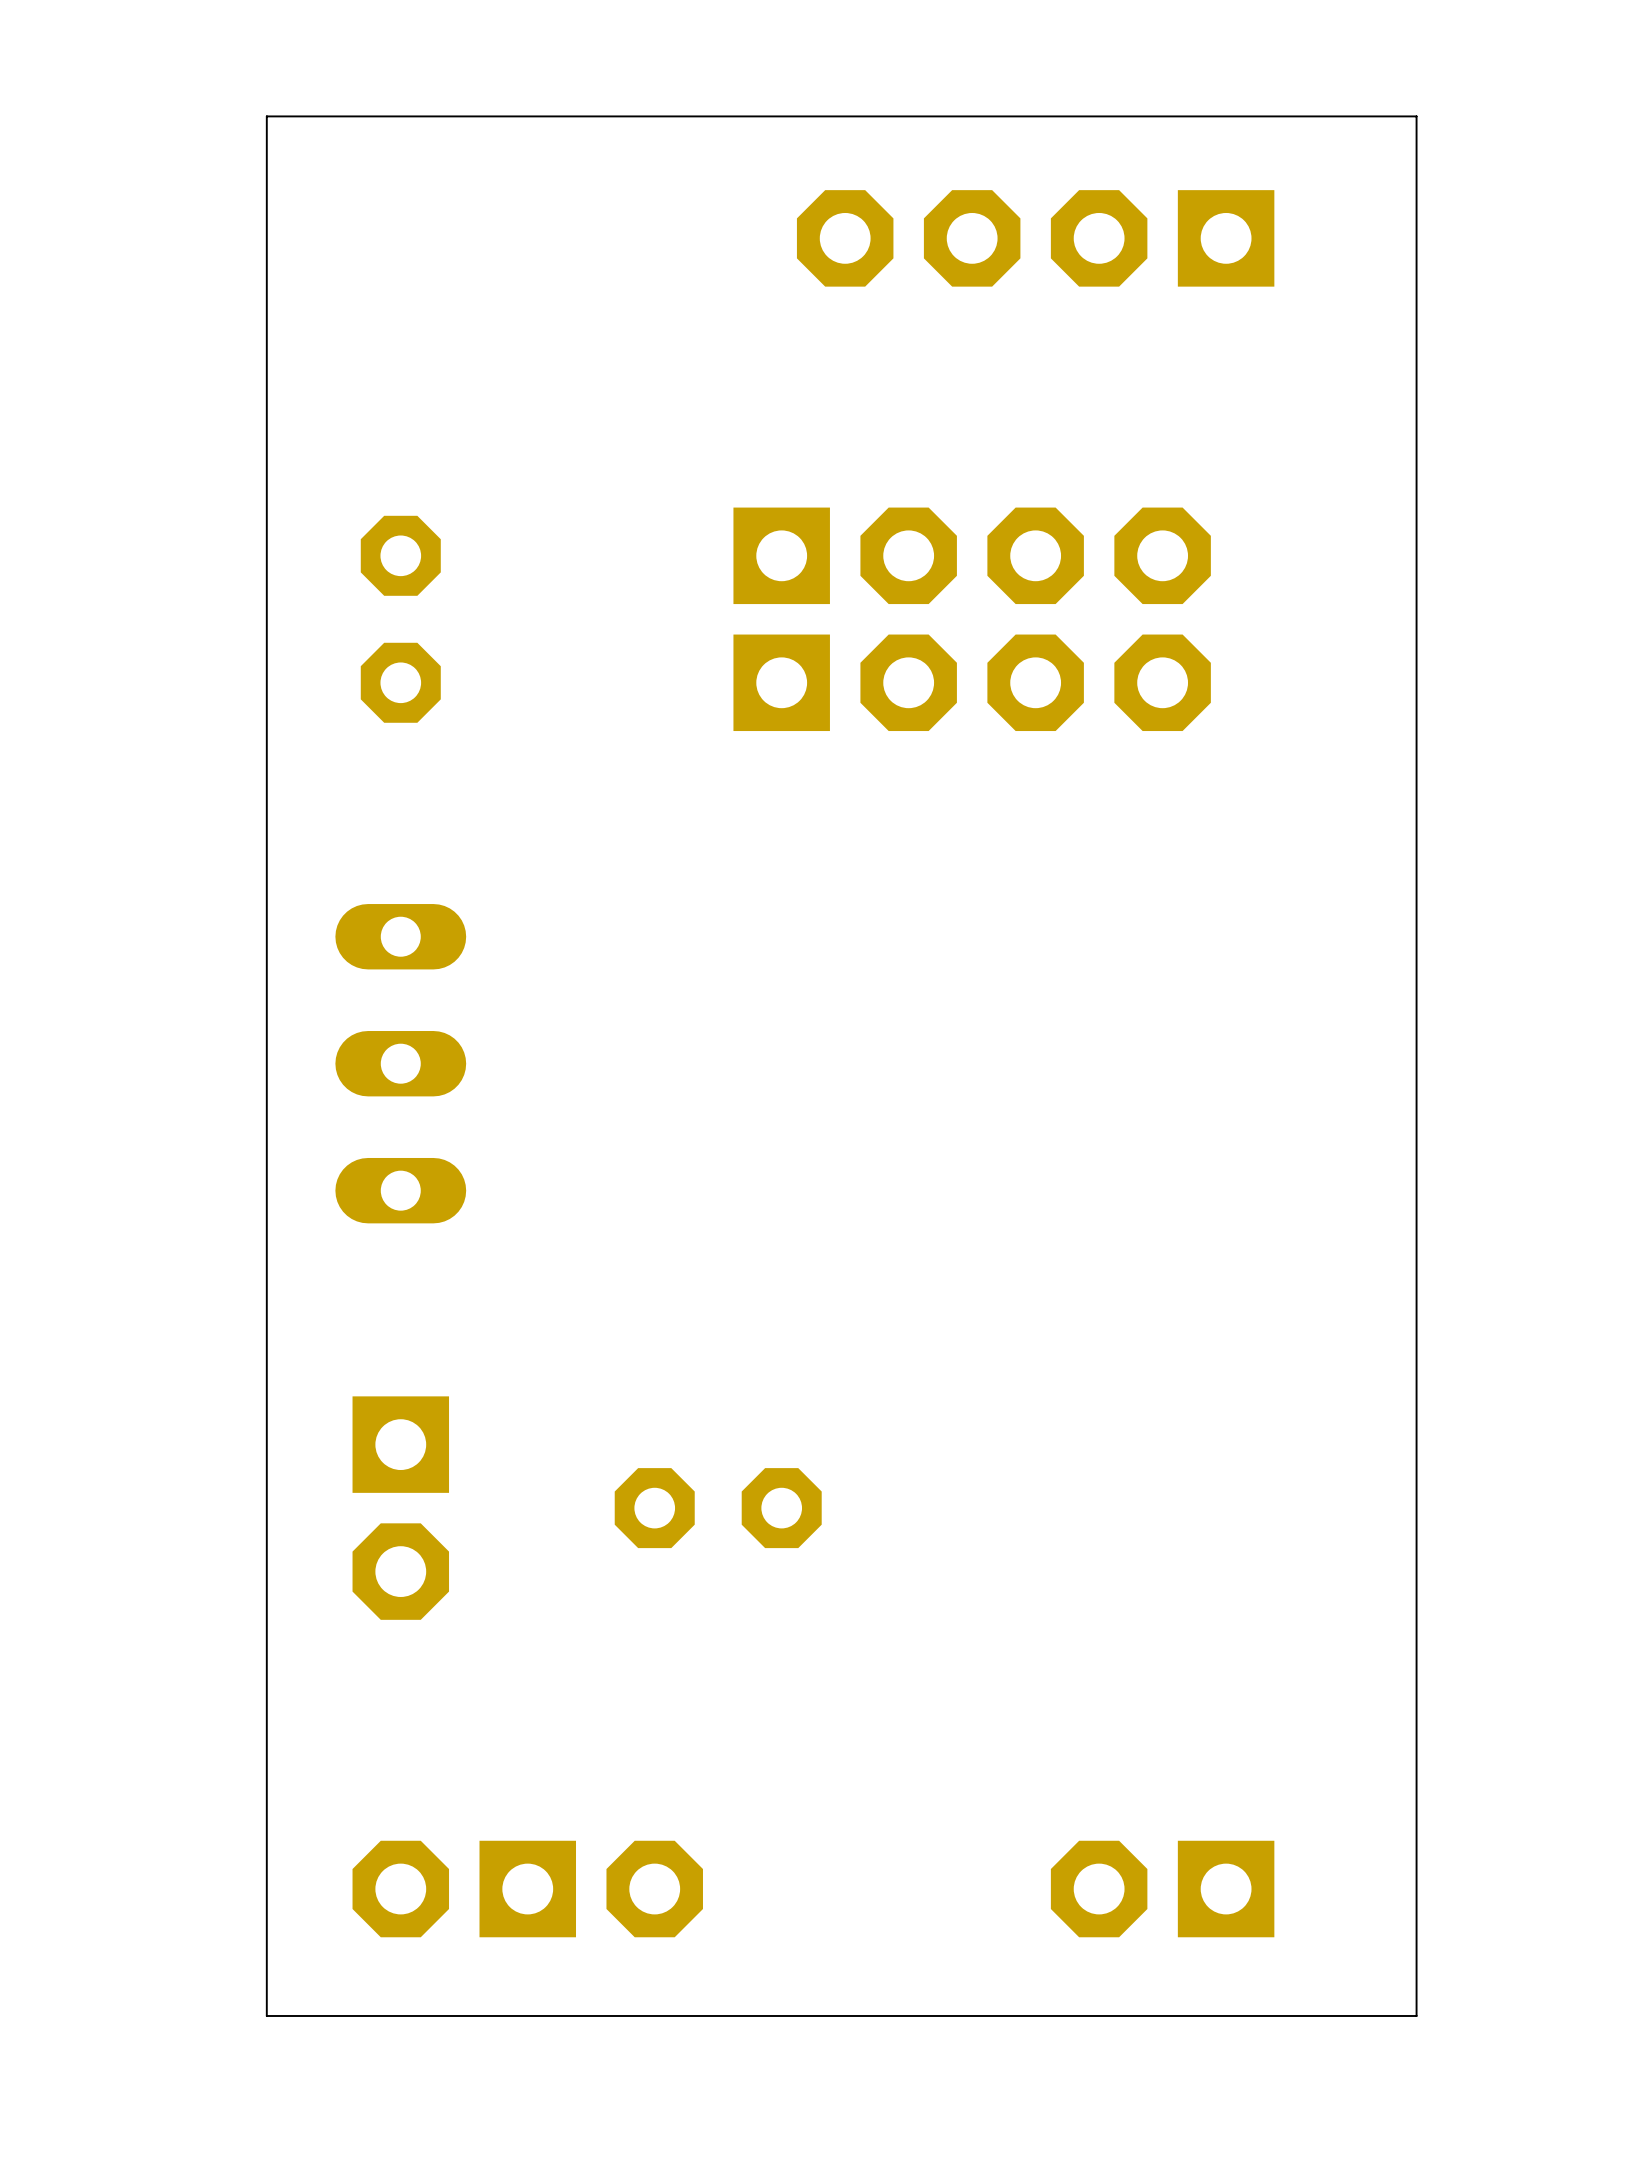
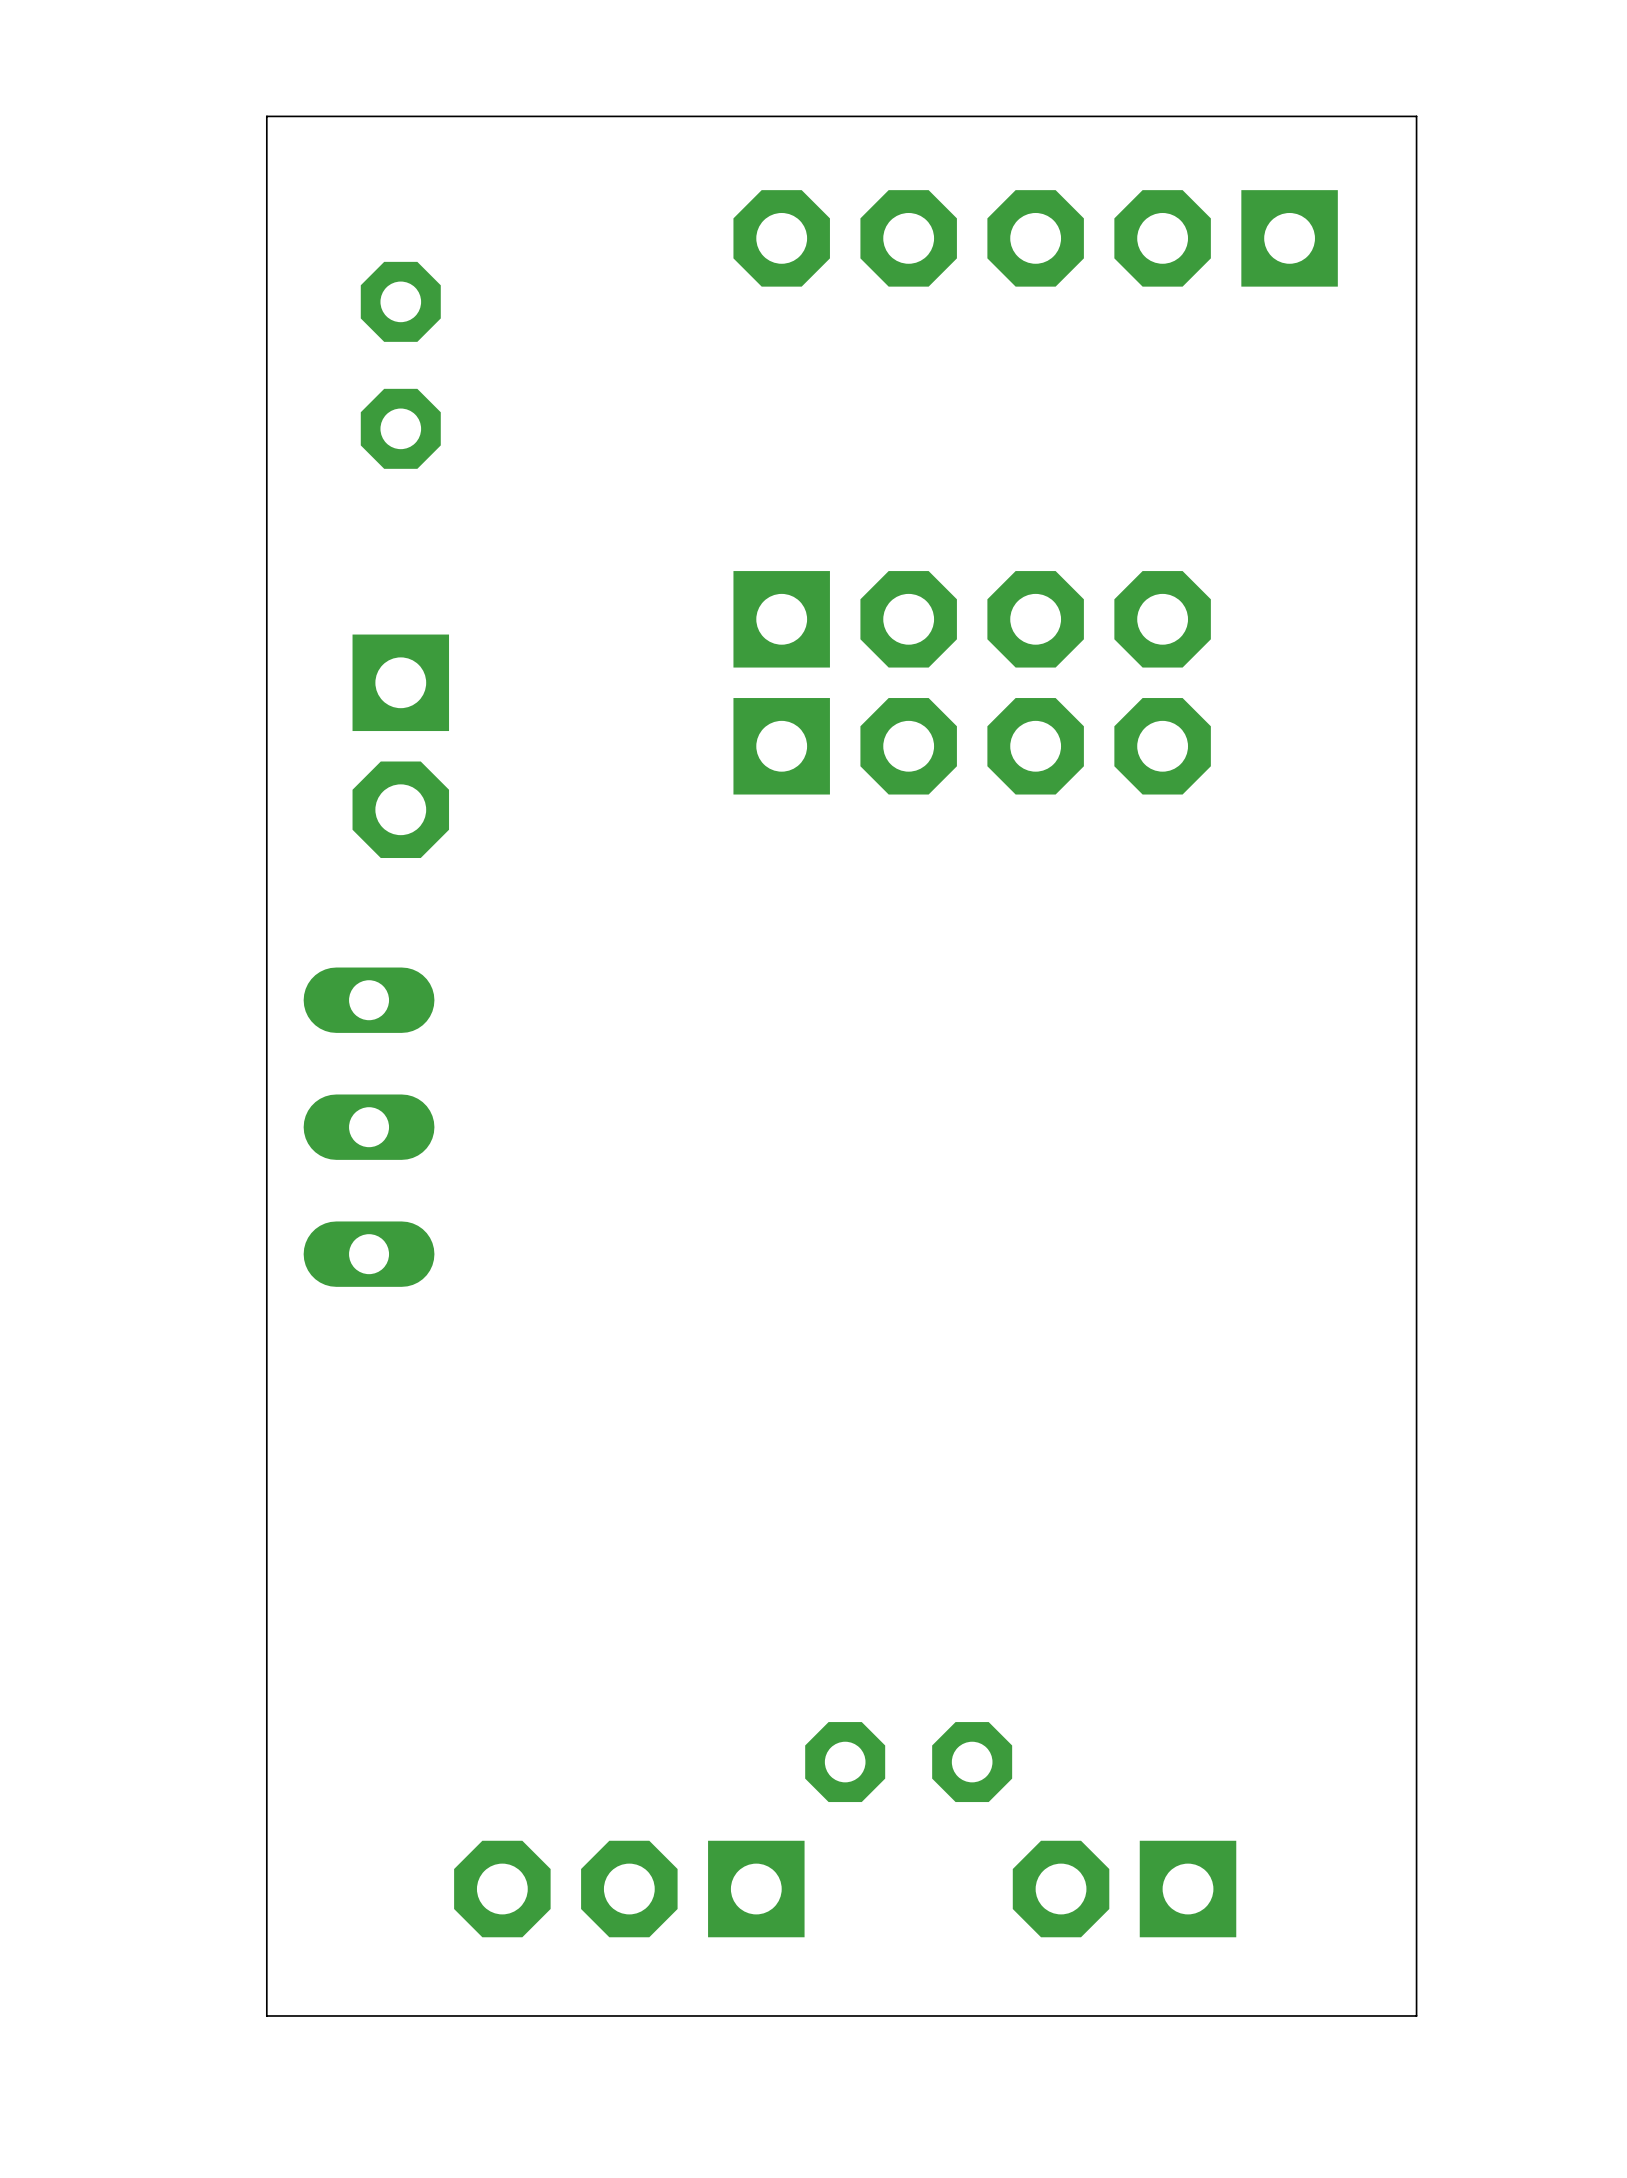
part footprint: [796, 190, 1275, 287] -> [733, 190, 1338, 287]
part: (972, 555) -> none
part position: (400, 619) -> (400, 365)
part: none -> (972, 619)
part: (972, 682) -> none
part: none -> (400, 746)
part: none -> (972, 746)
part position: (400, 1063) -> (369, 1127)
part: (400, 1508) -> none
part position: (718, 1508) -> (908, 1762)
part footprint: [606, 1840, 703, 1938] -> [454, 1840, 805, 1938]
part: (464, 1889) -> none
part position: (1162, 1889) -> (1124, 1889)

